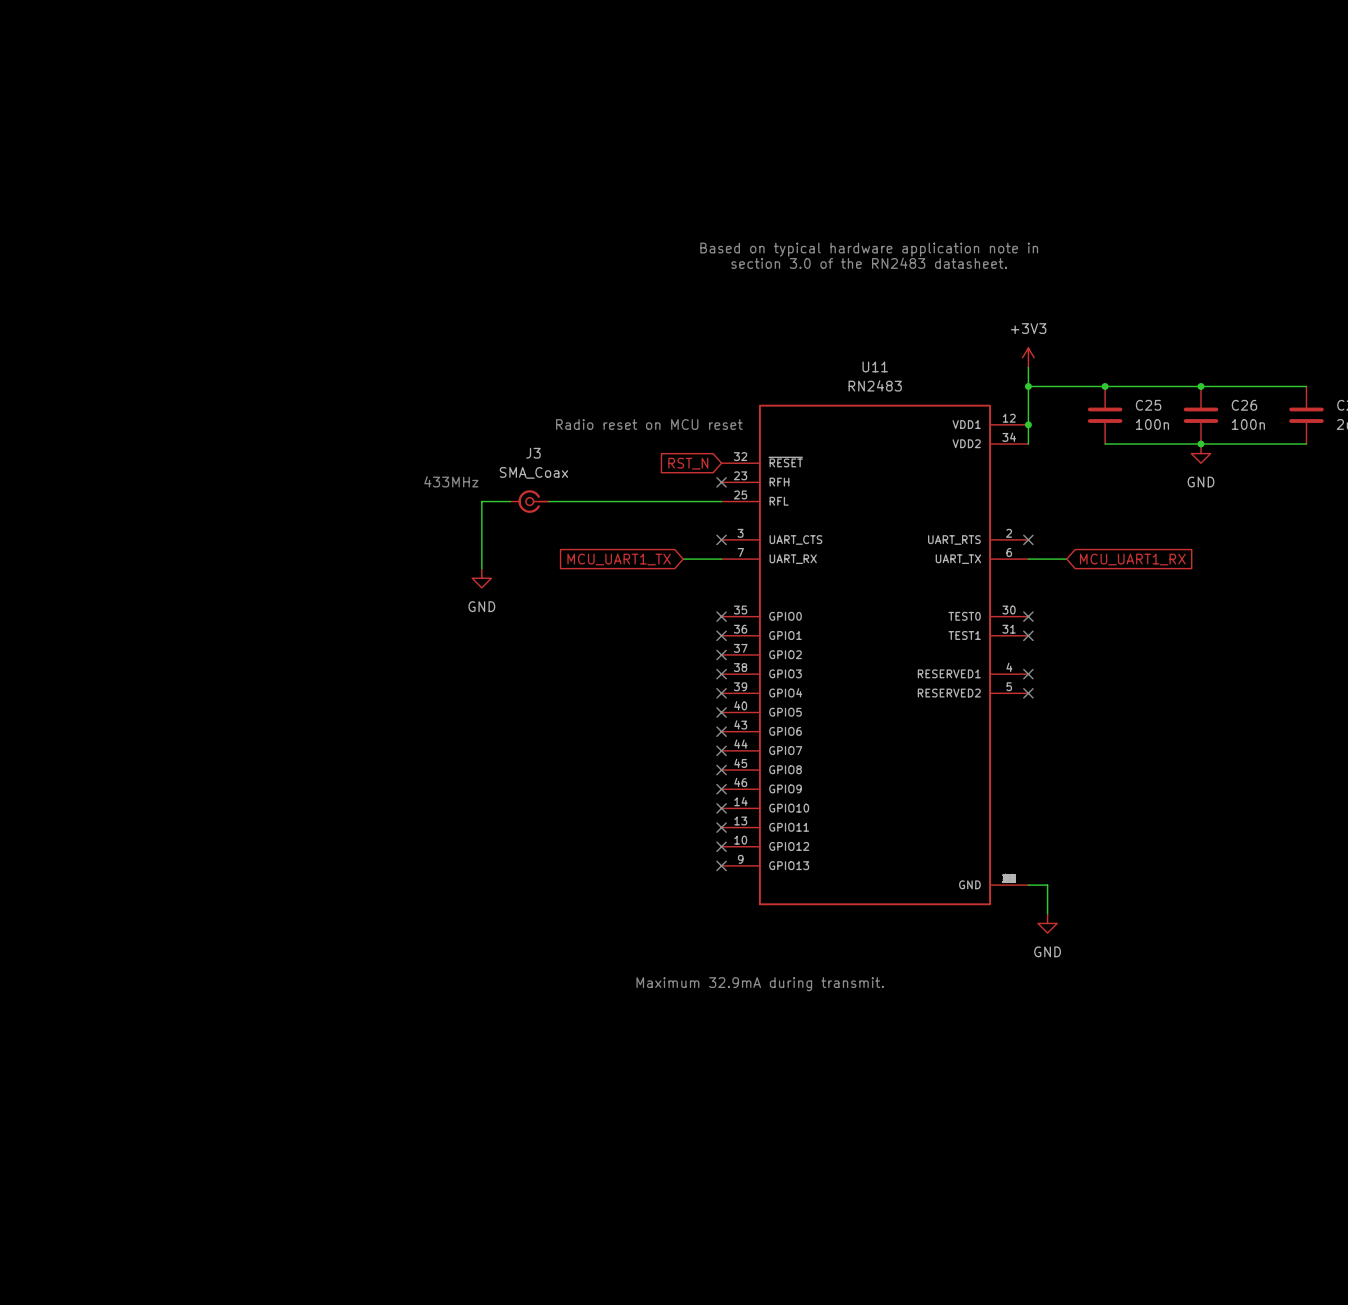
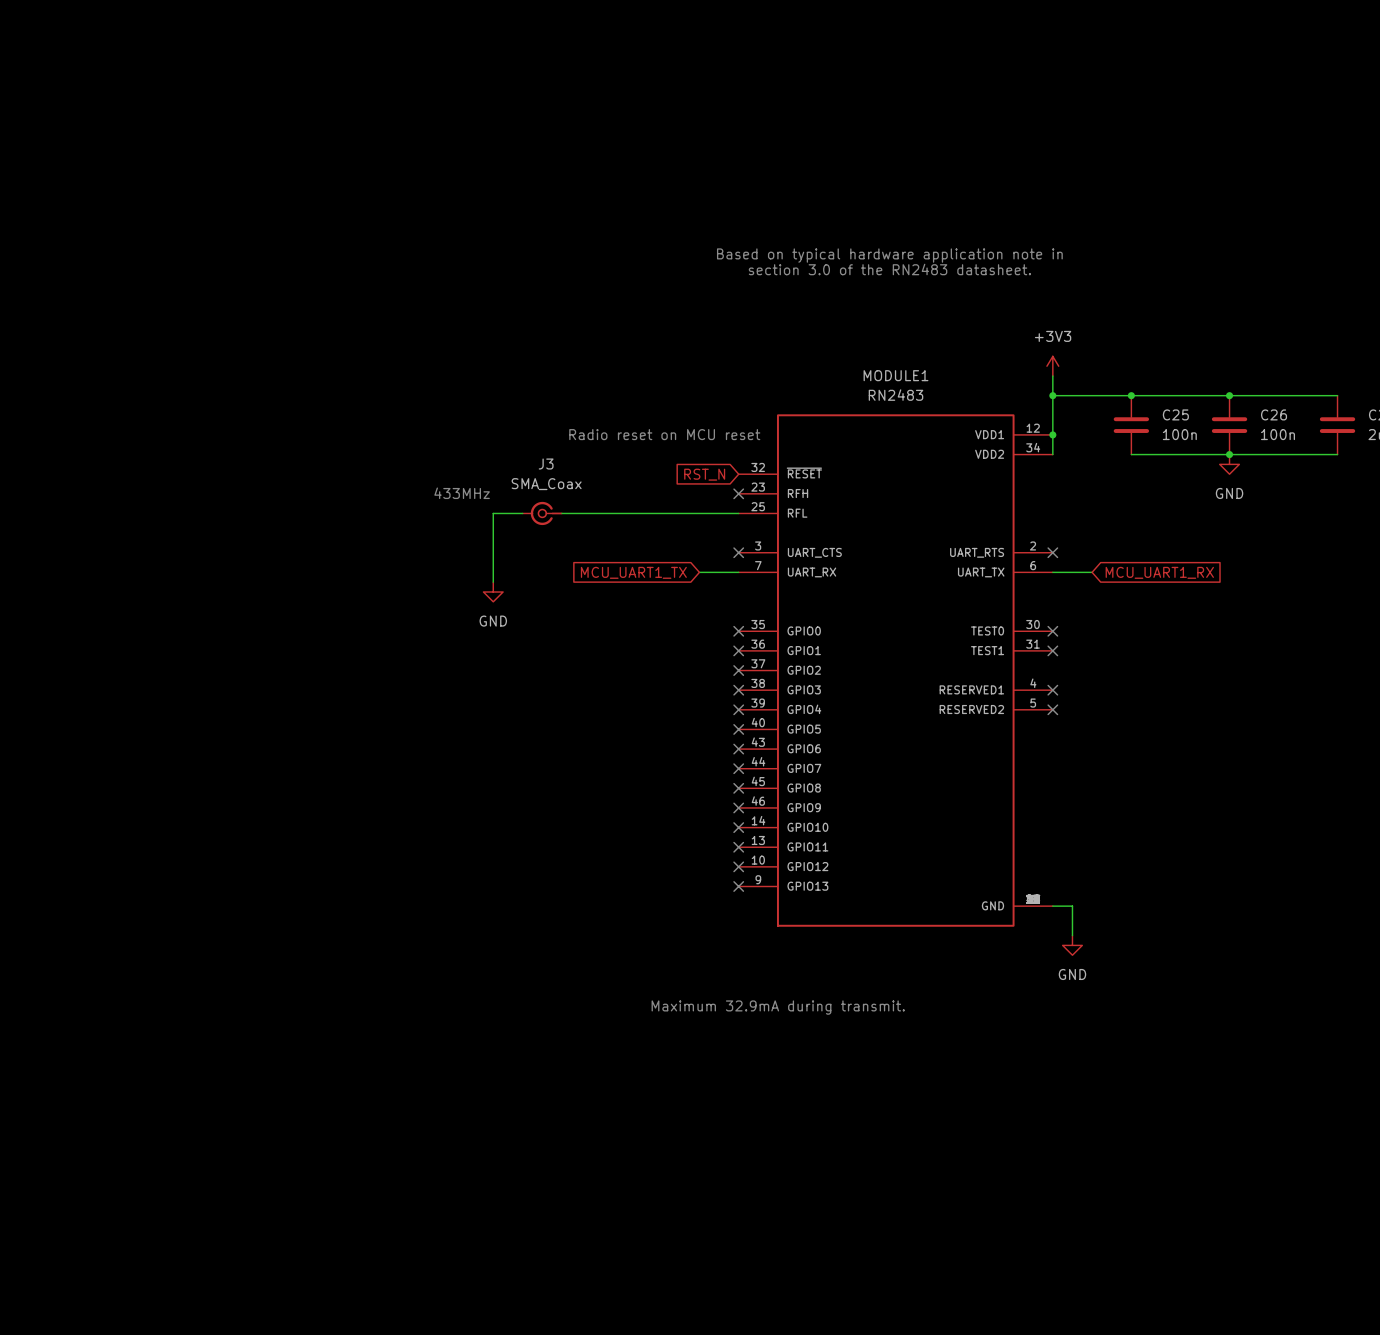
U11 name: U11 (875, 366) -> MODULE1 (896, 375)

